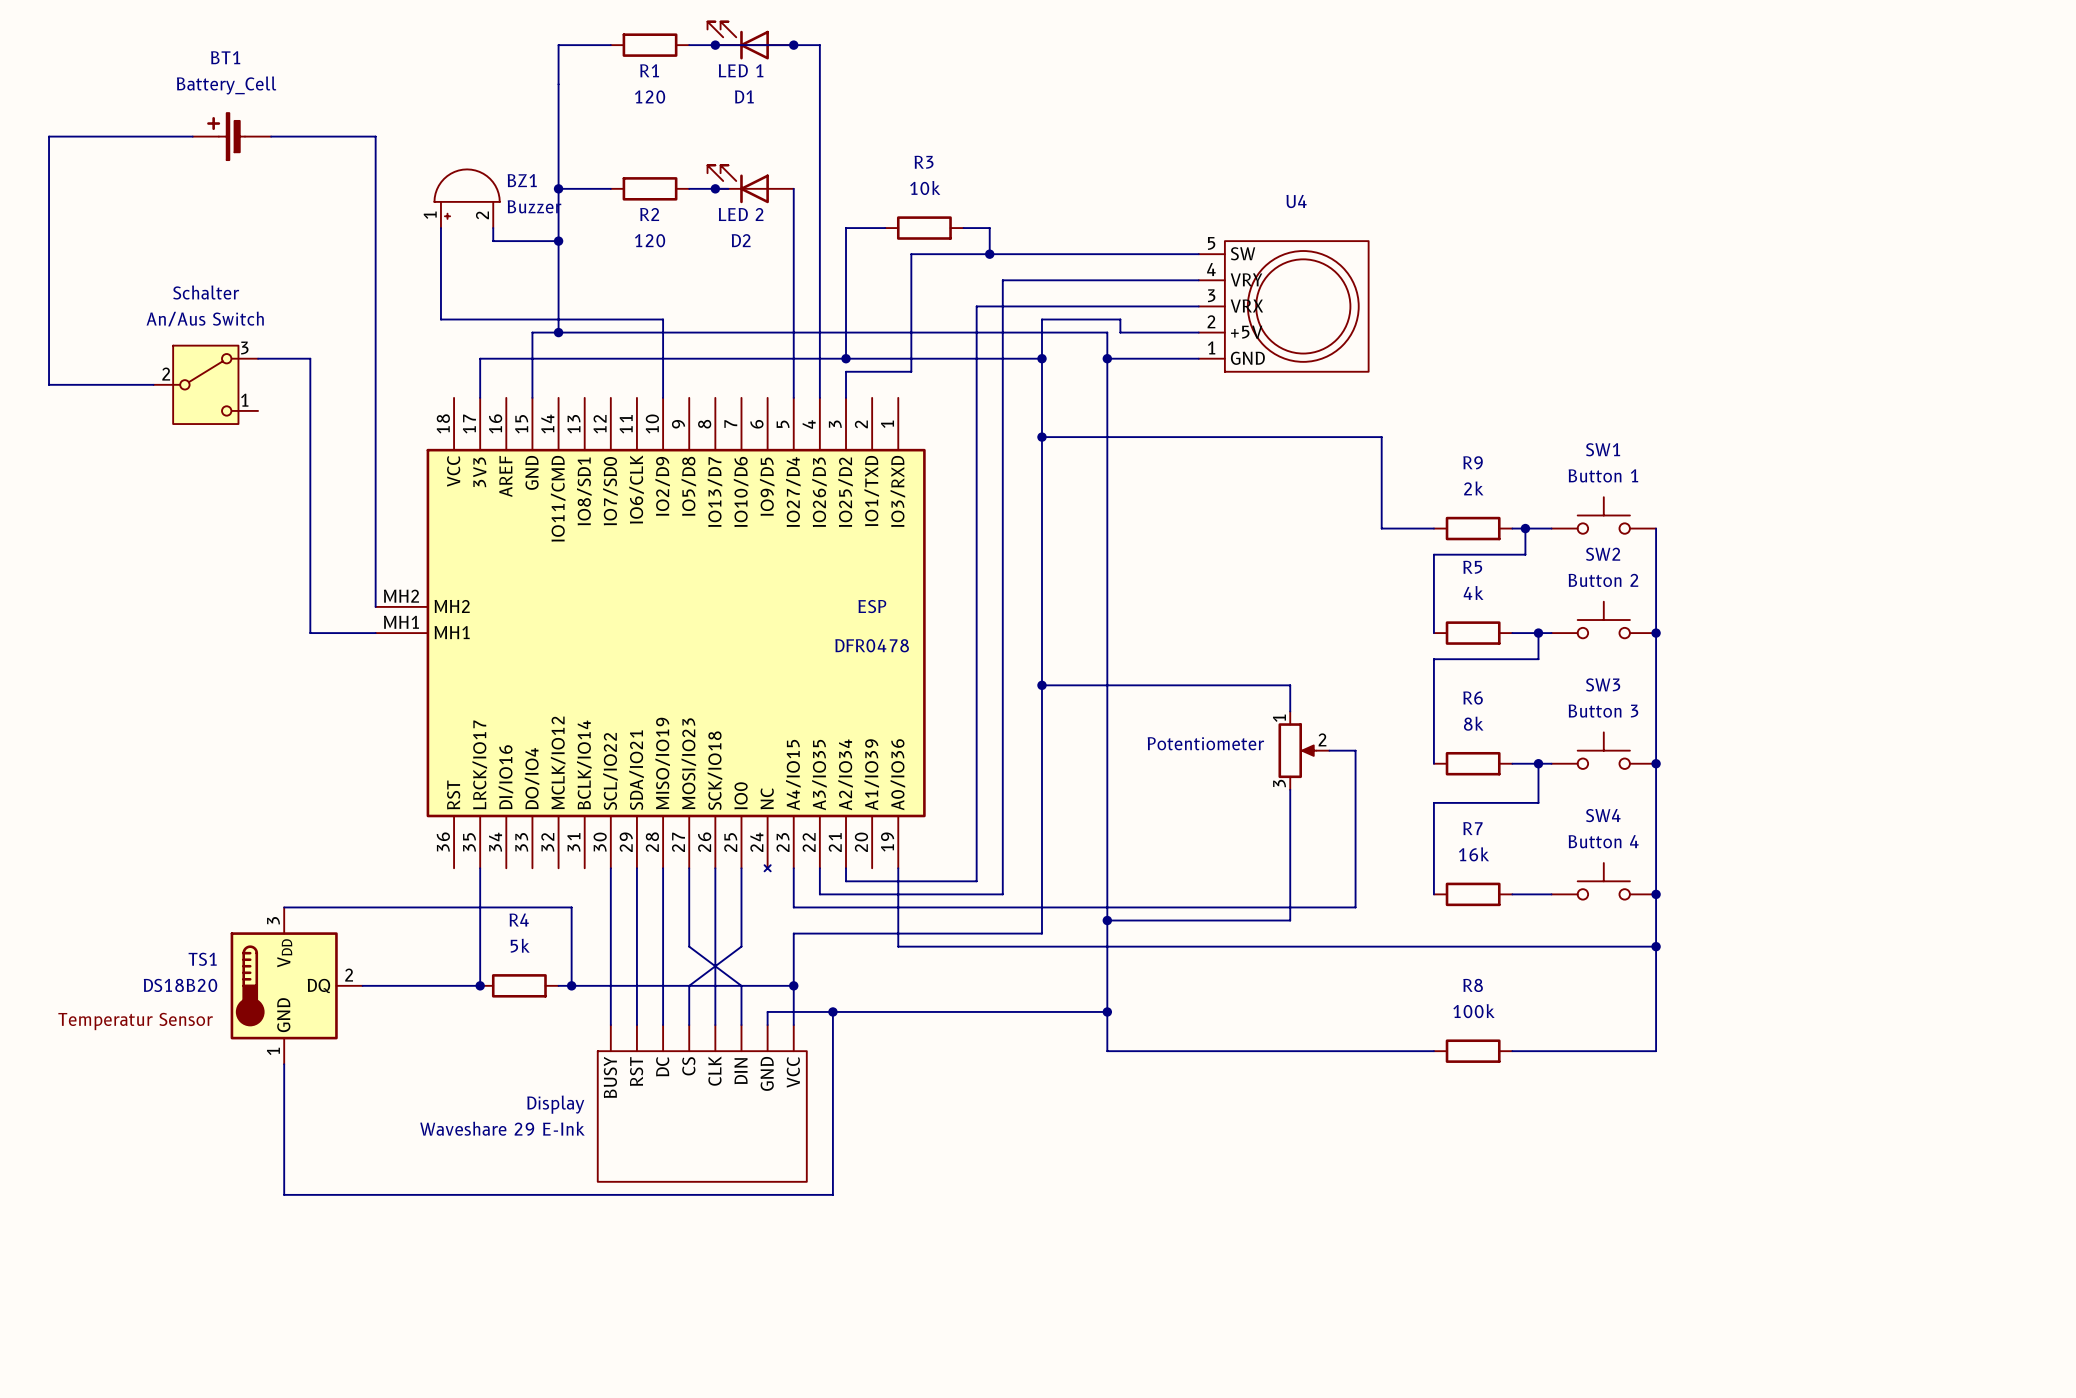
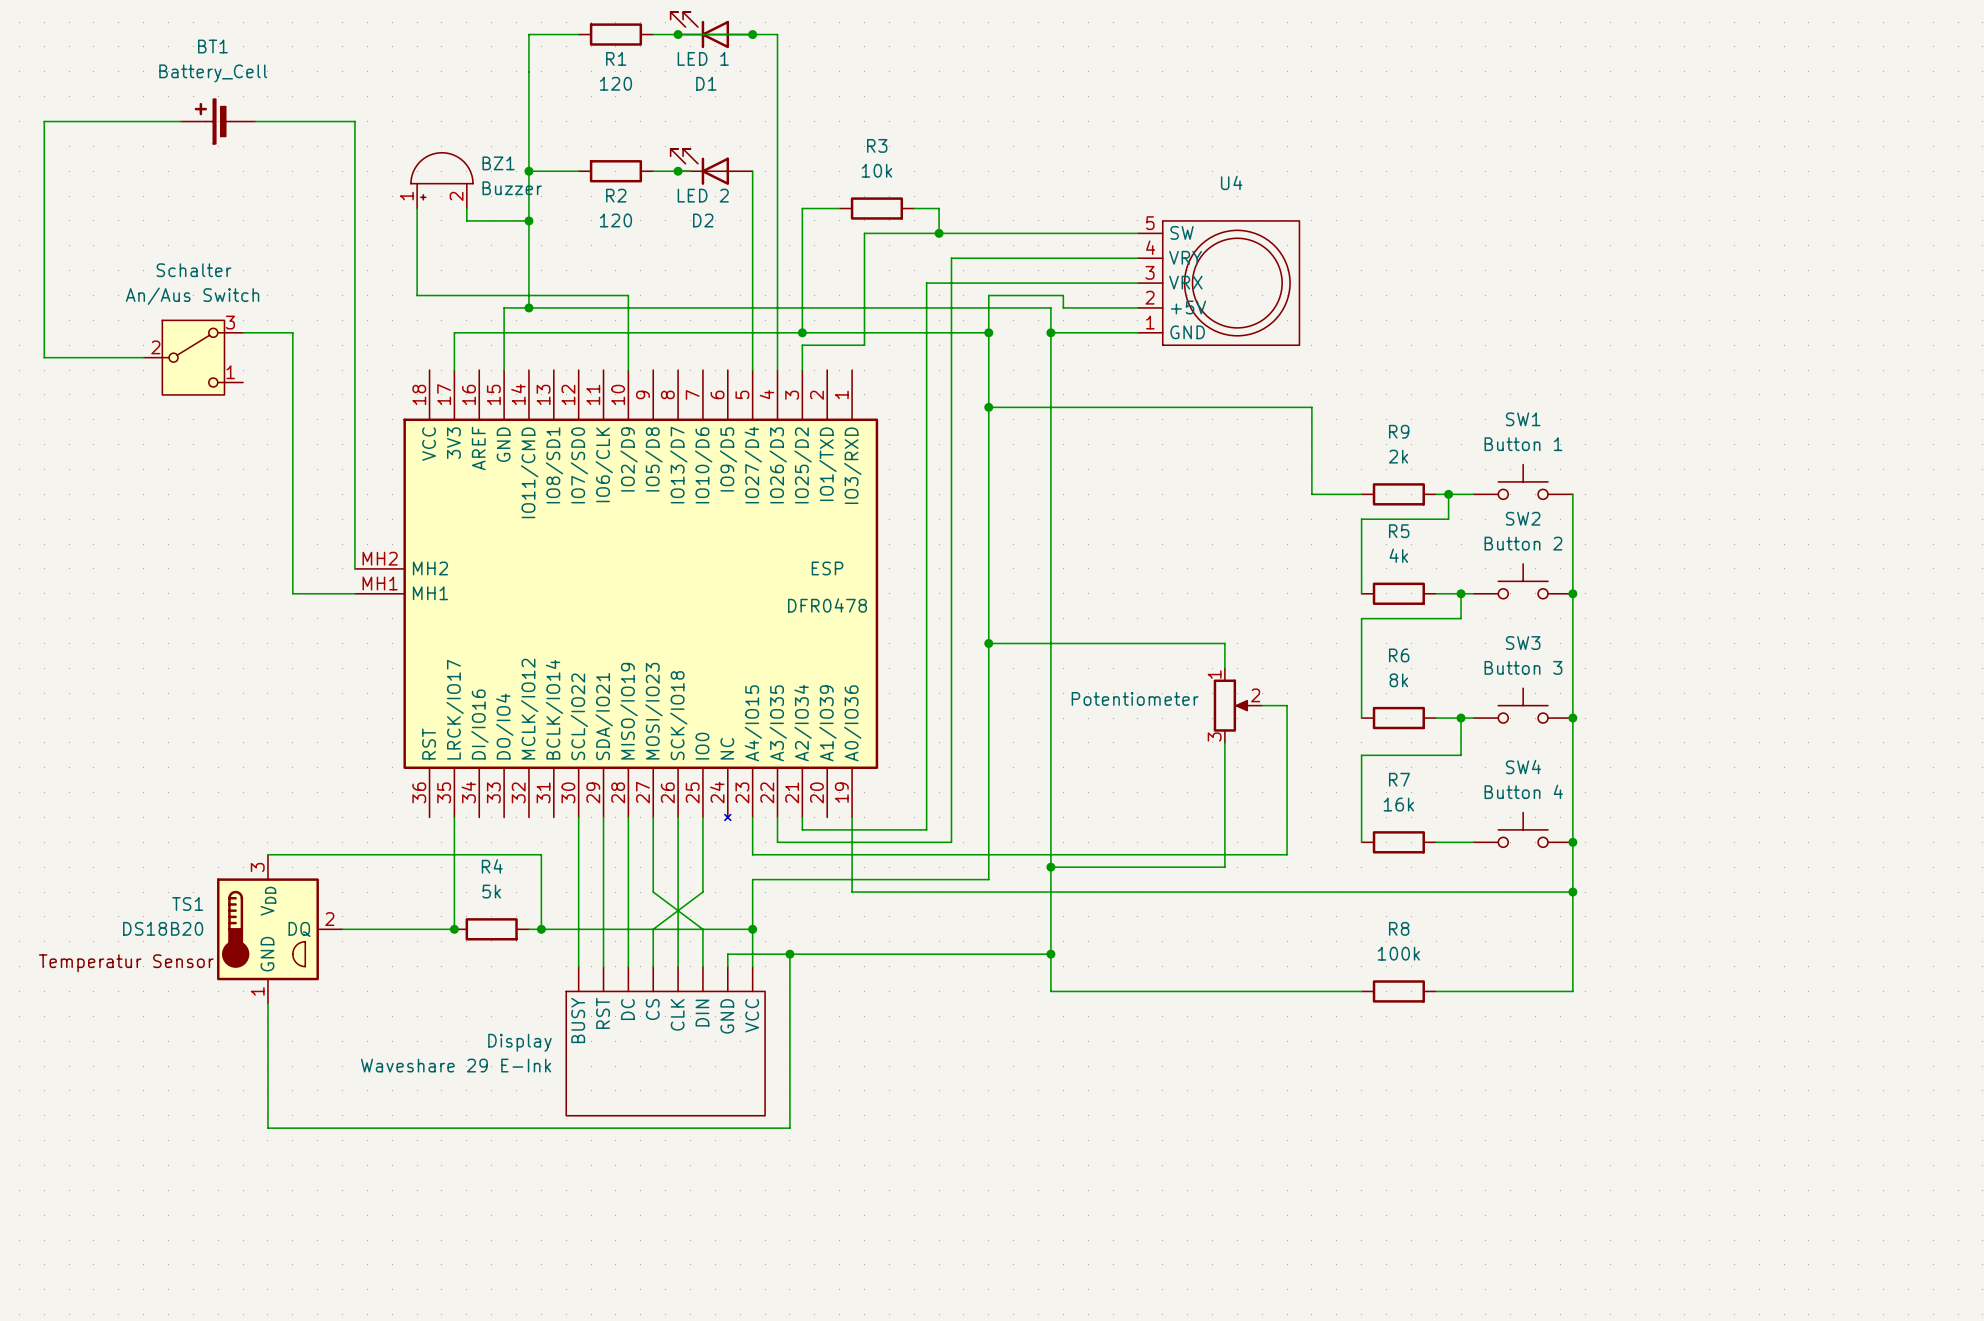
TS1 symbol: [230, 907, 363, 1065] -> [217, 854, 343, 1004]

